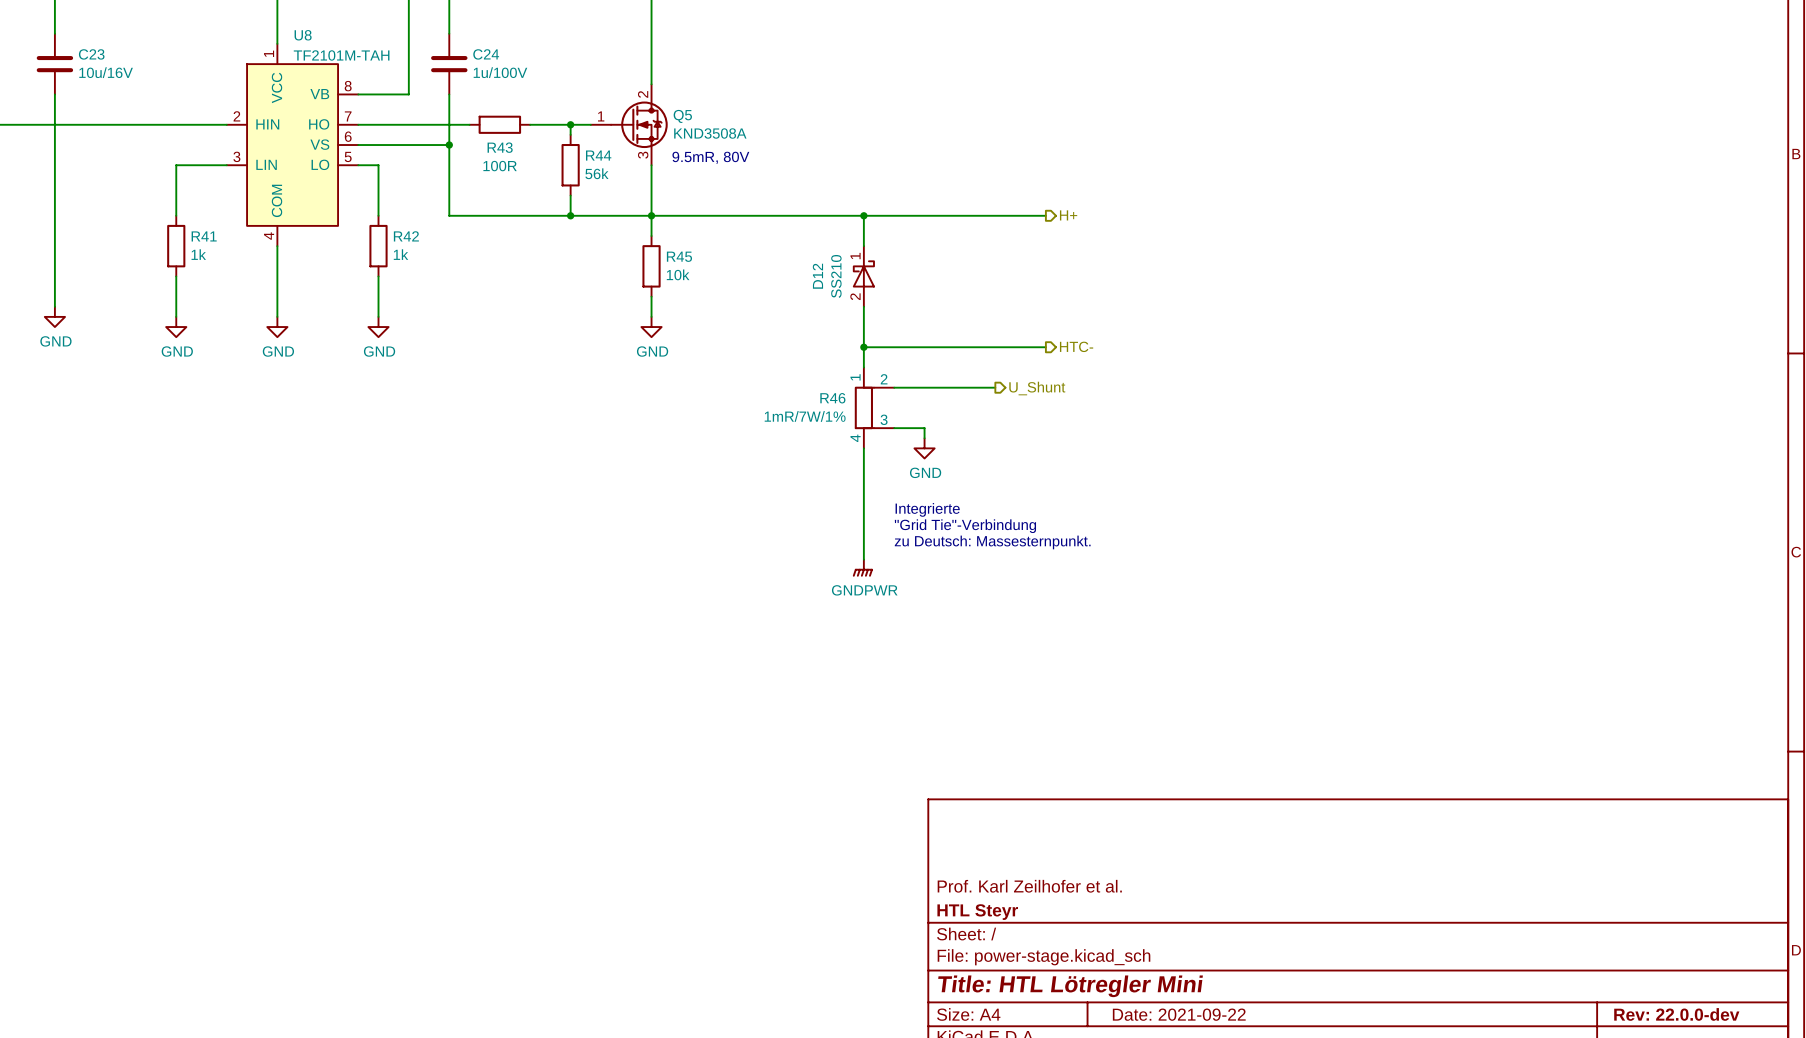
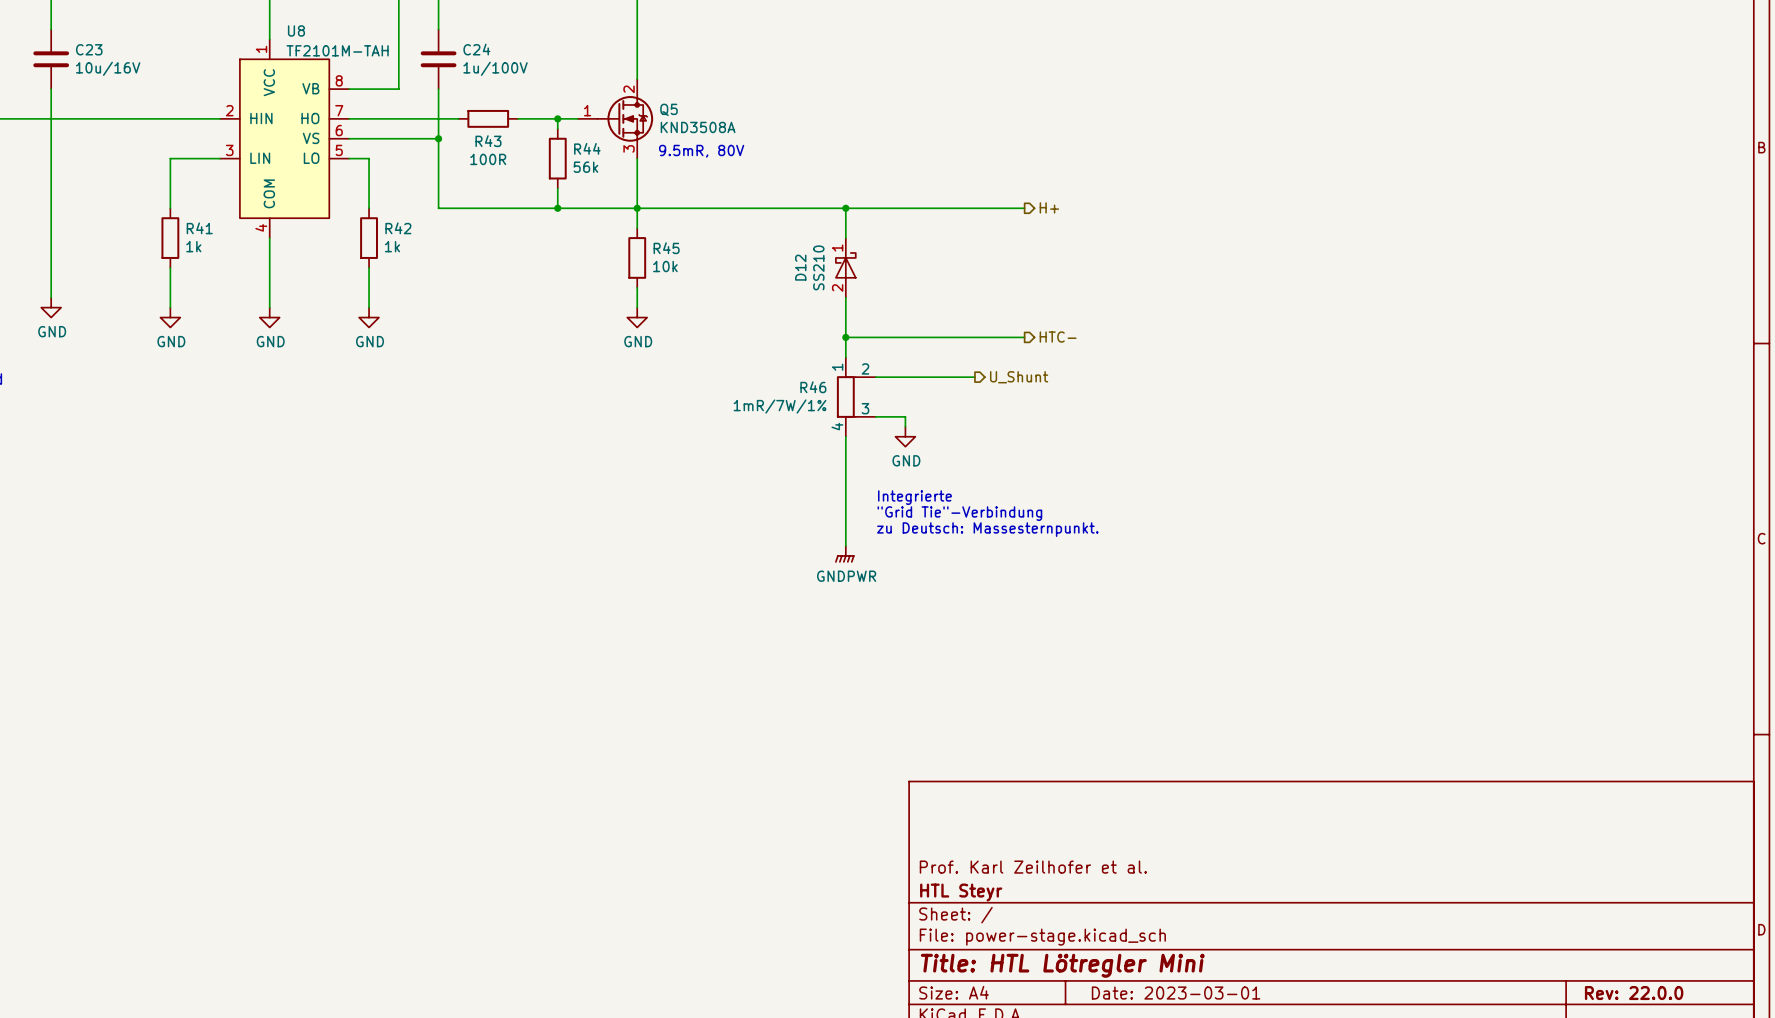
title block: Date: 2021-09-22 (1179, 1014) -> Date: 2023-03-01 (1176, 993)
title block: Rev: 22.0.0-dev (1676, 1014) -> Rev: 22.0.0 (1634, 993)

